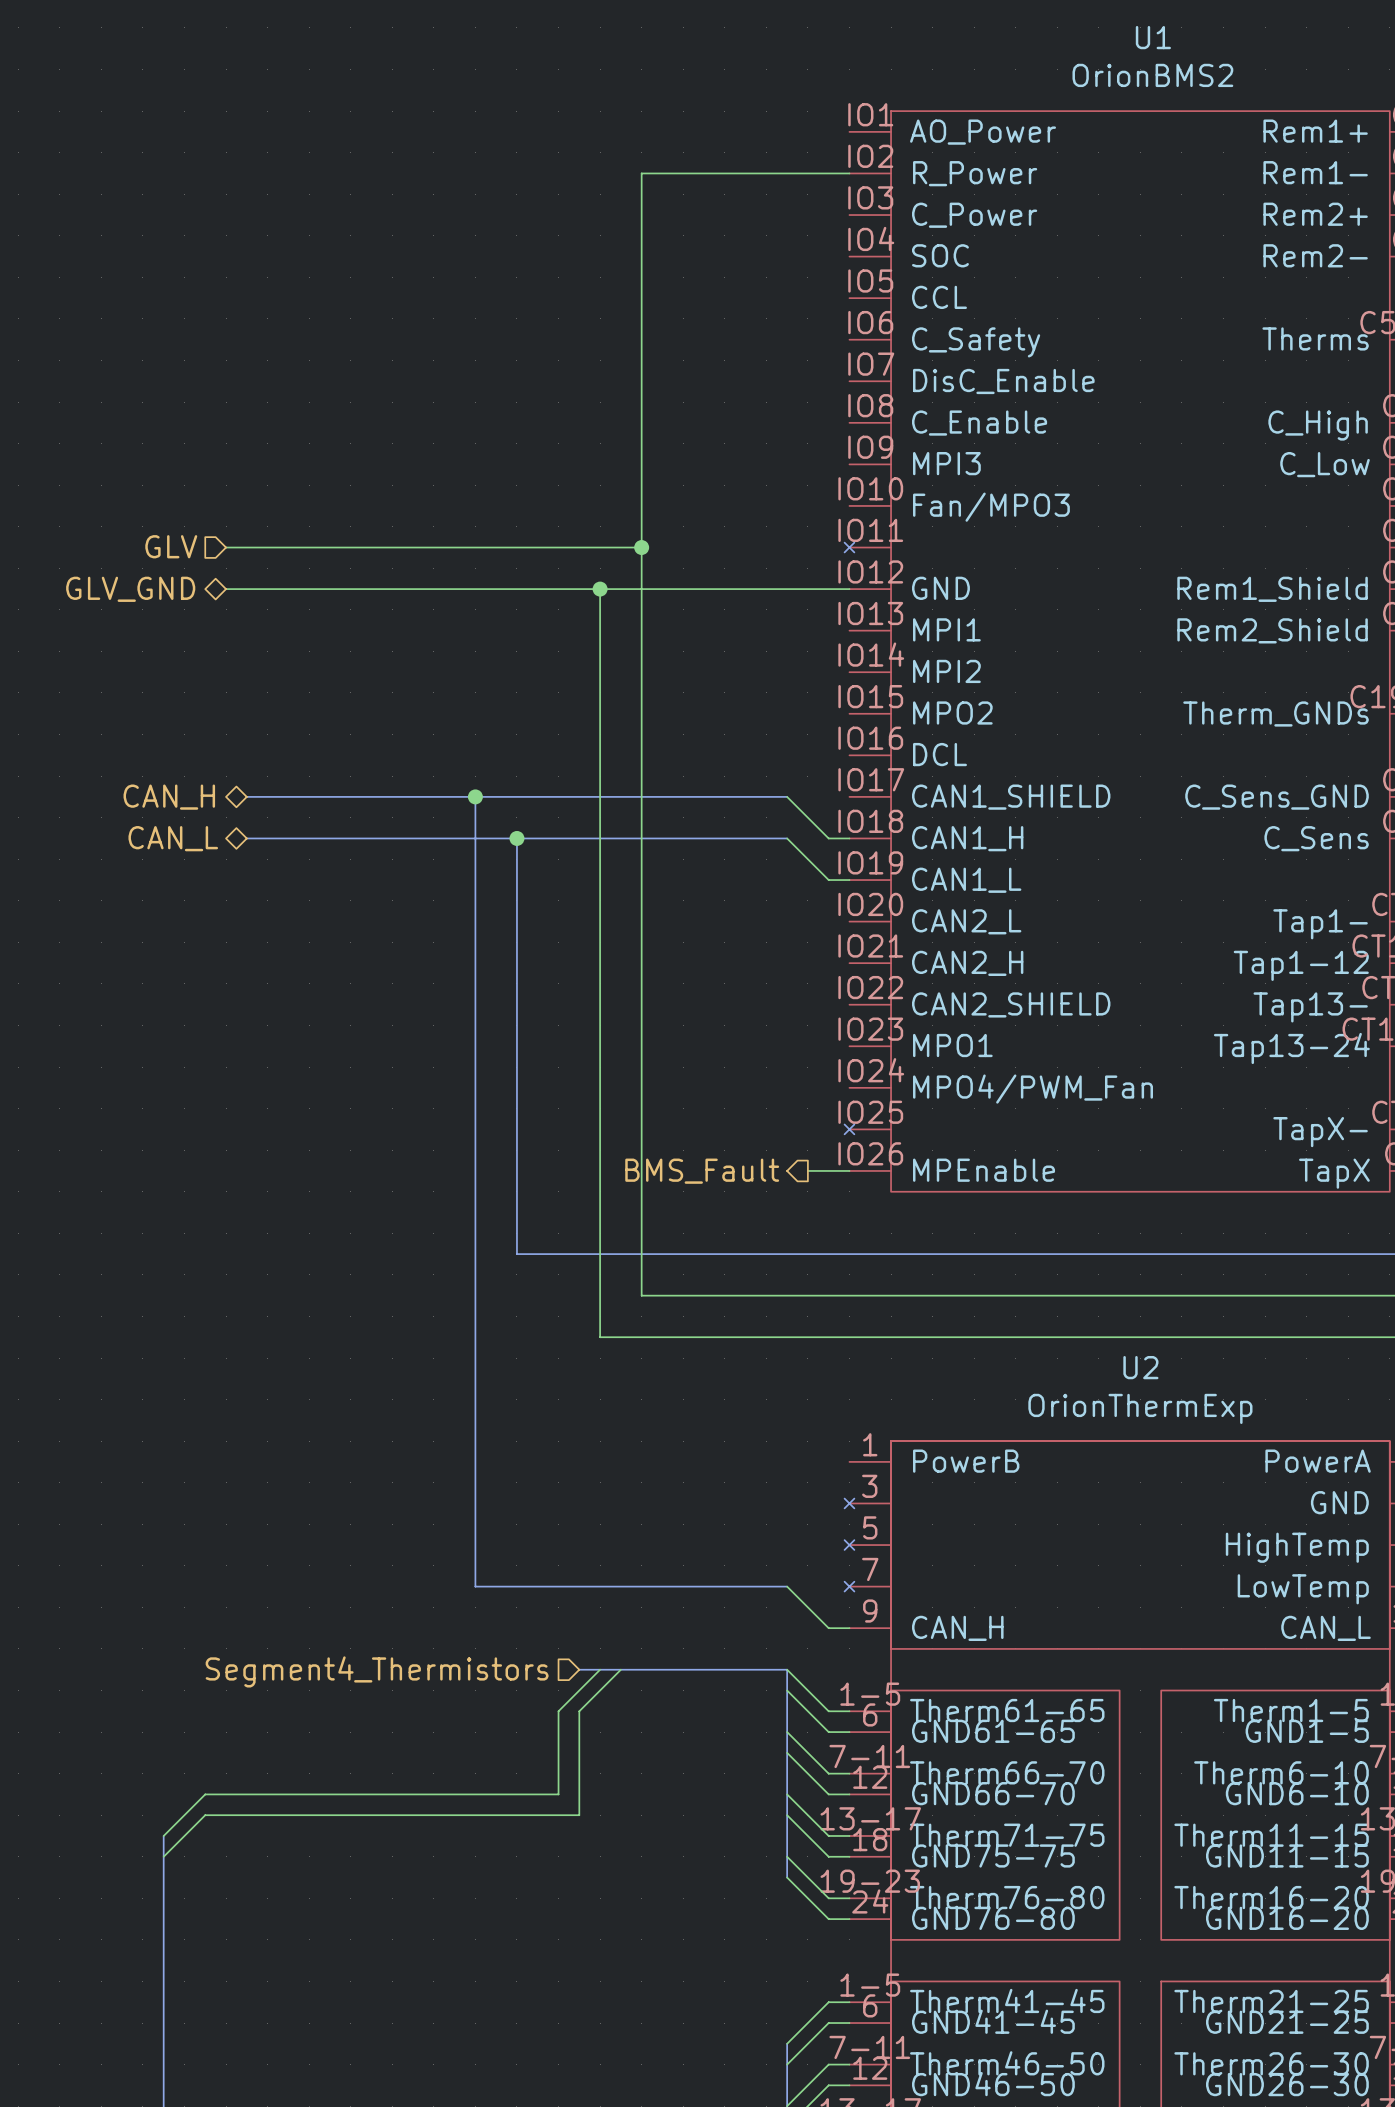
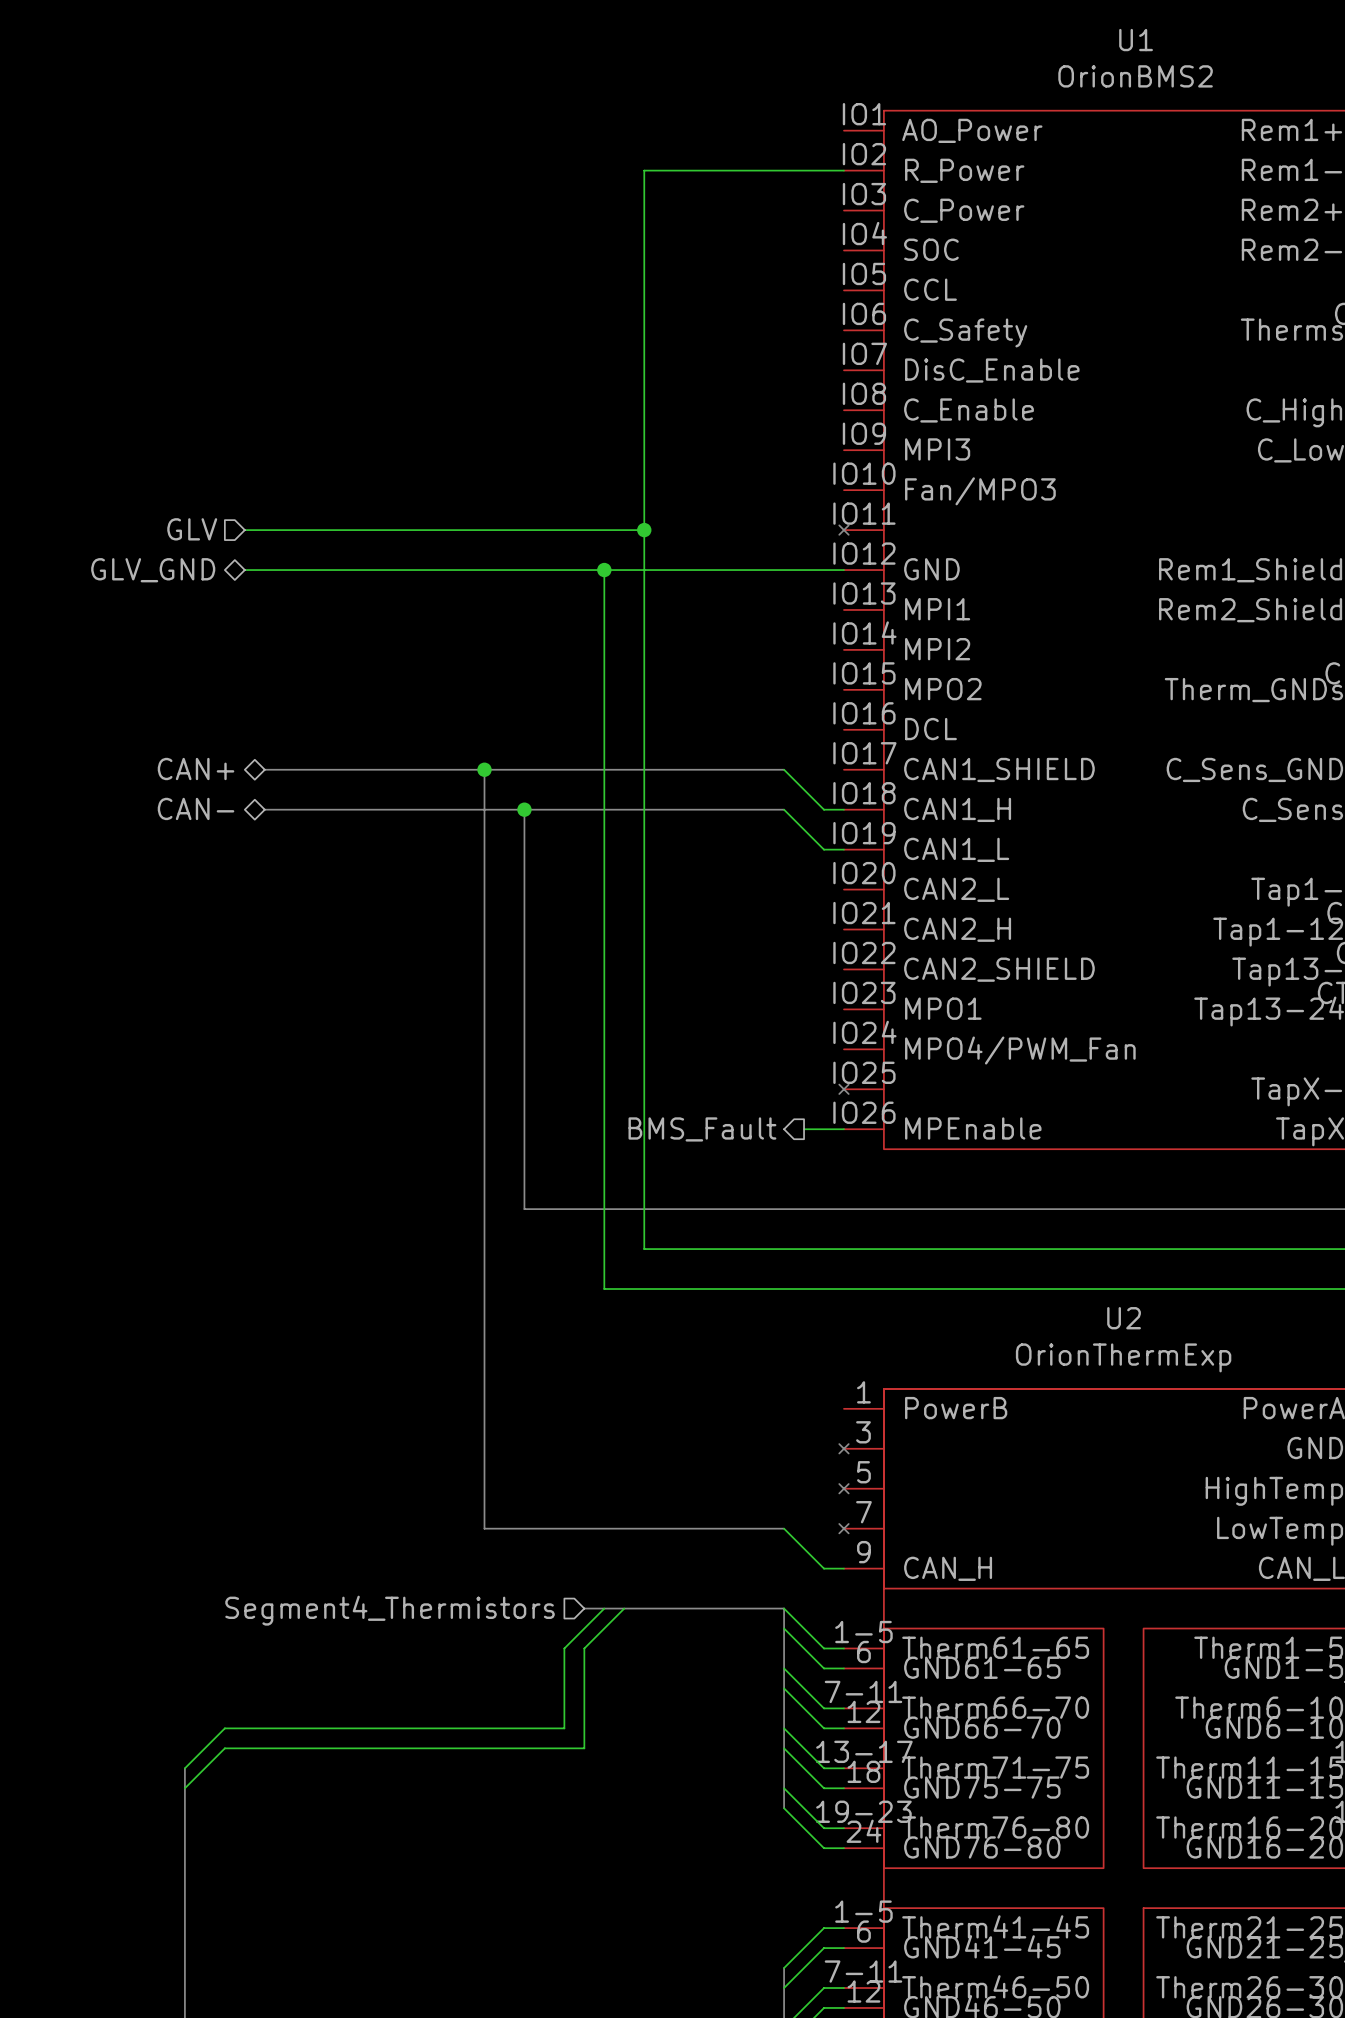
hierarchical label: CAN_H (169, 797) -> CAN+ (196, 769)
hierarchical label: CAN_L (173, 838) -> CAN- (196, 808)

